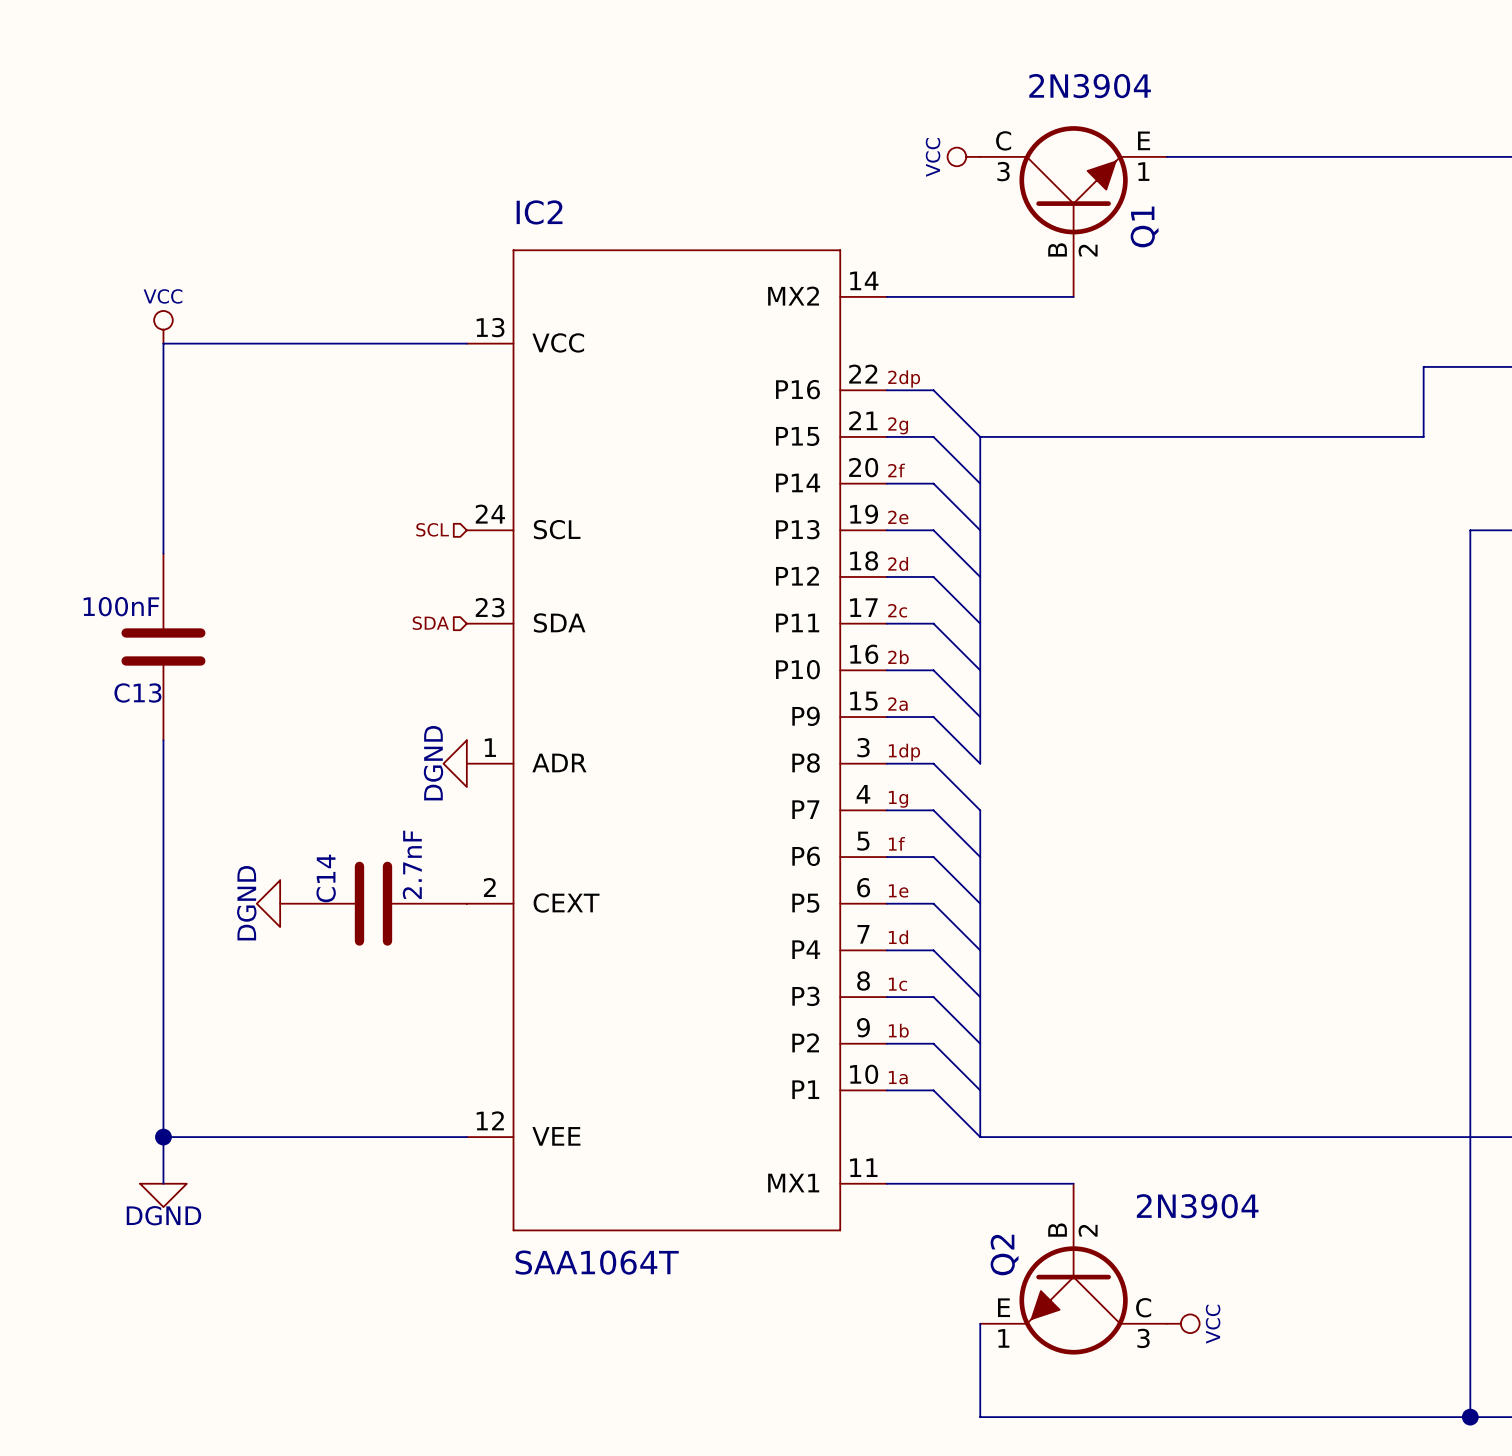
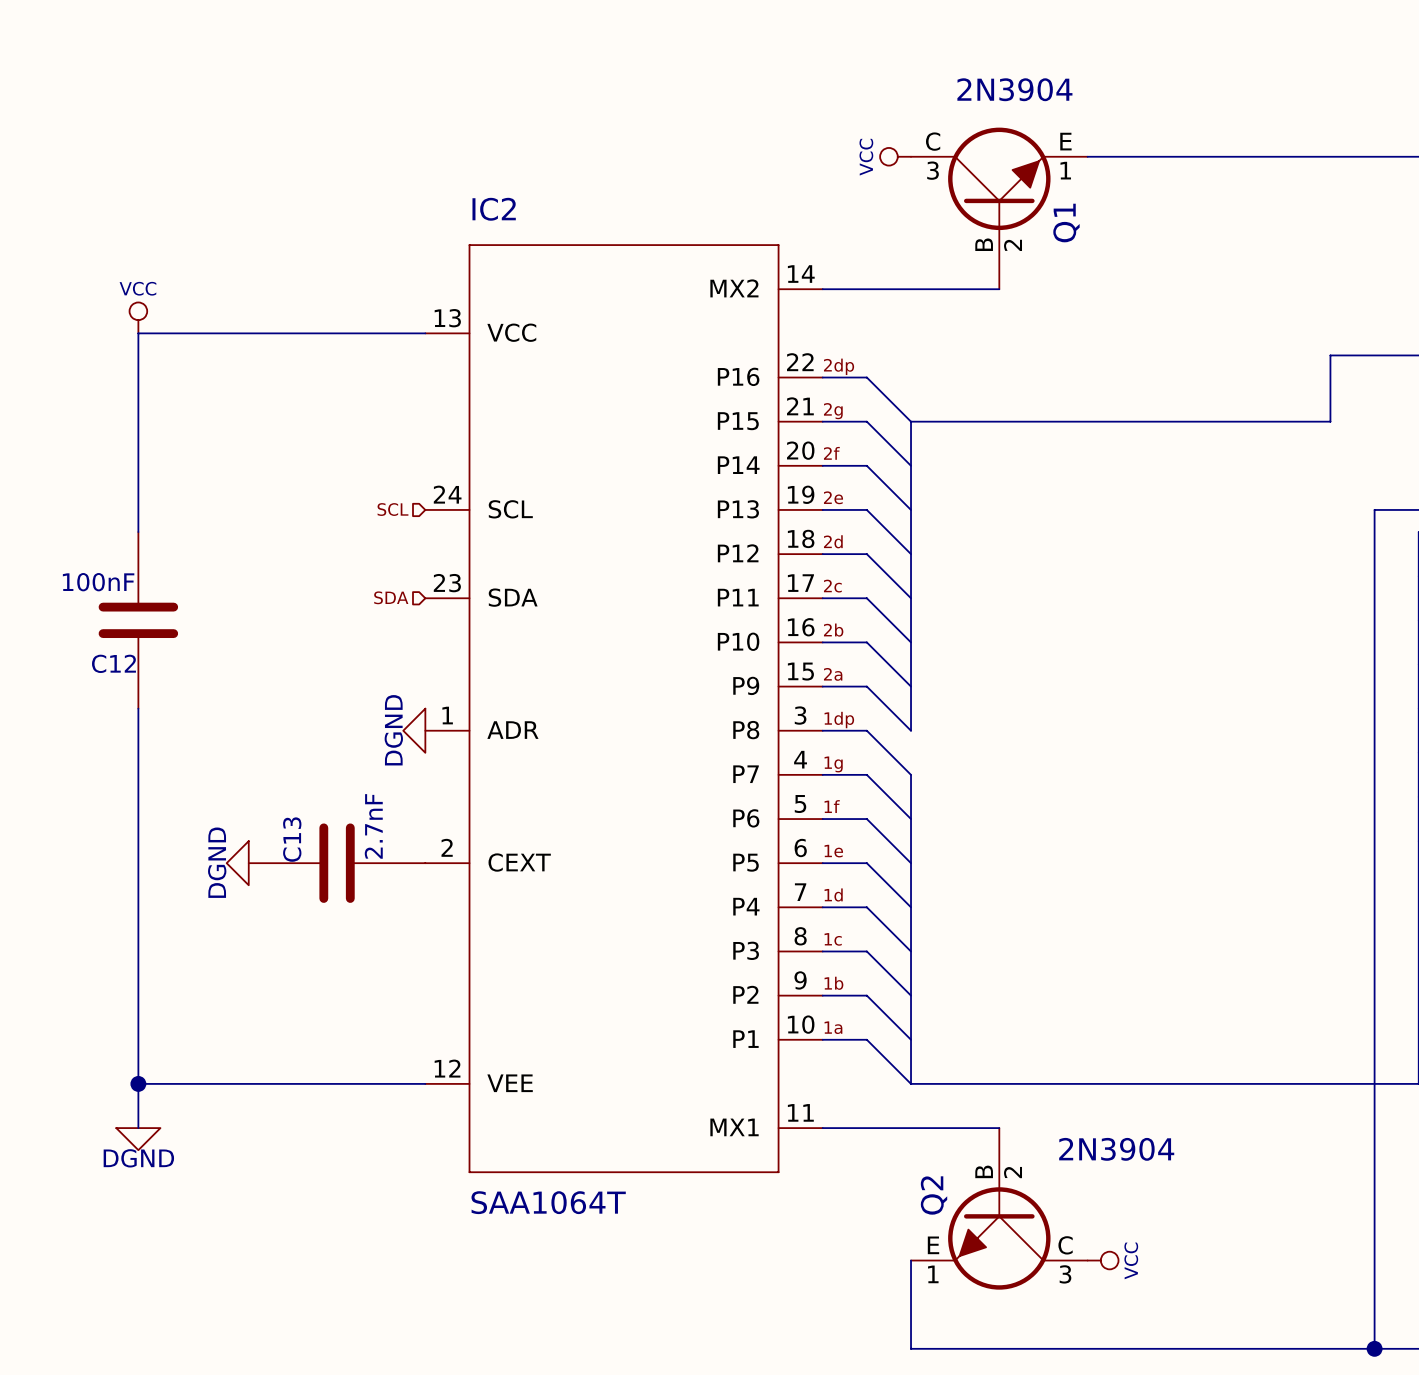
C13 name: C13 (137, 692) -> C12 (113, 663)
C14 name: C14 (326, 878) -> C13 (292, 839)

